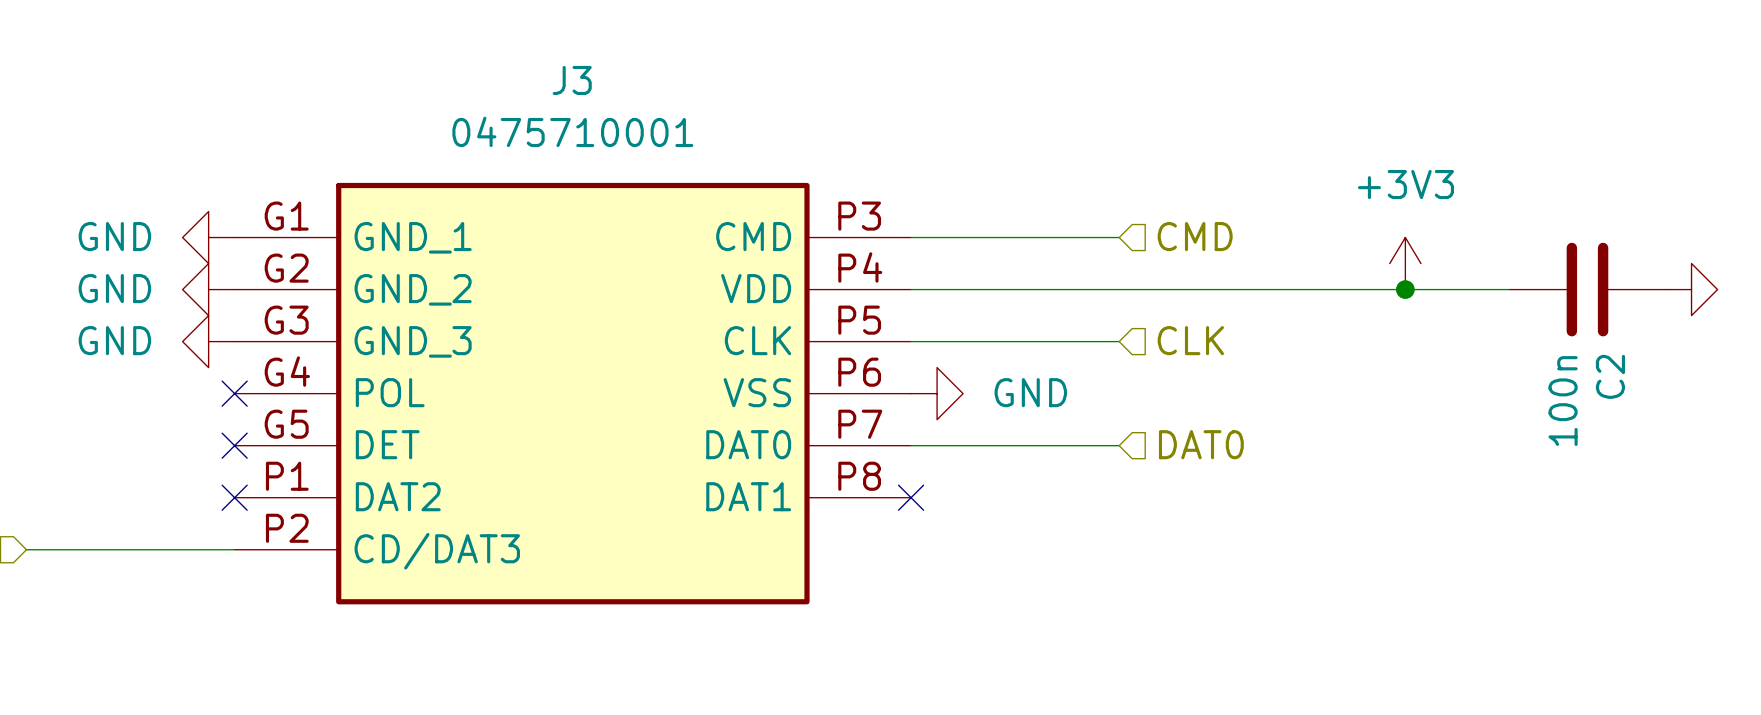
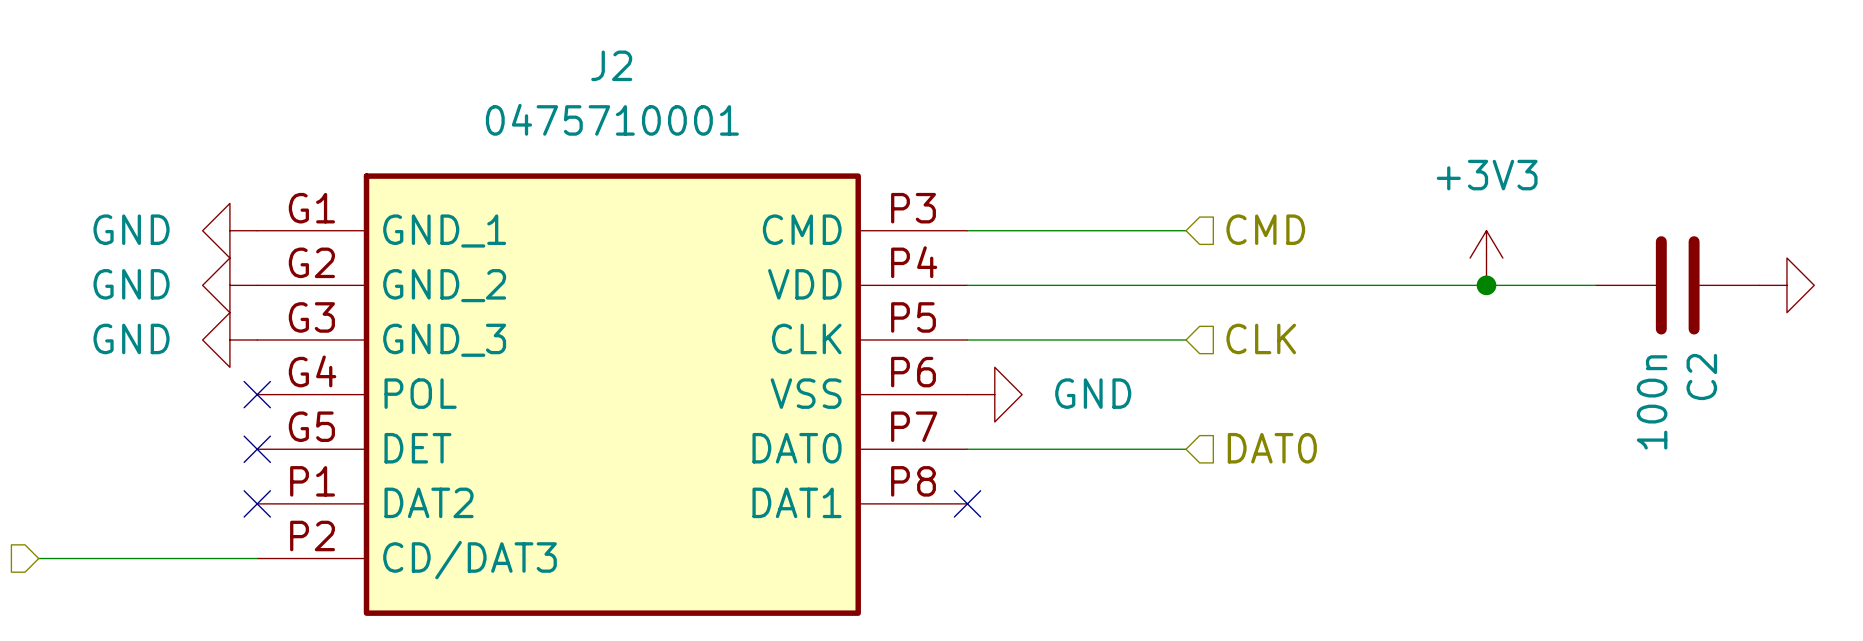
J3 name: J3 (572, 80) -> J2 (611, 65)

